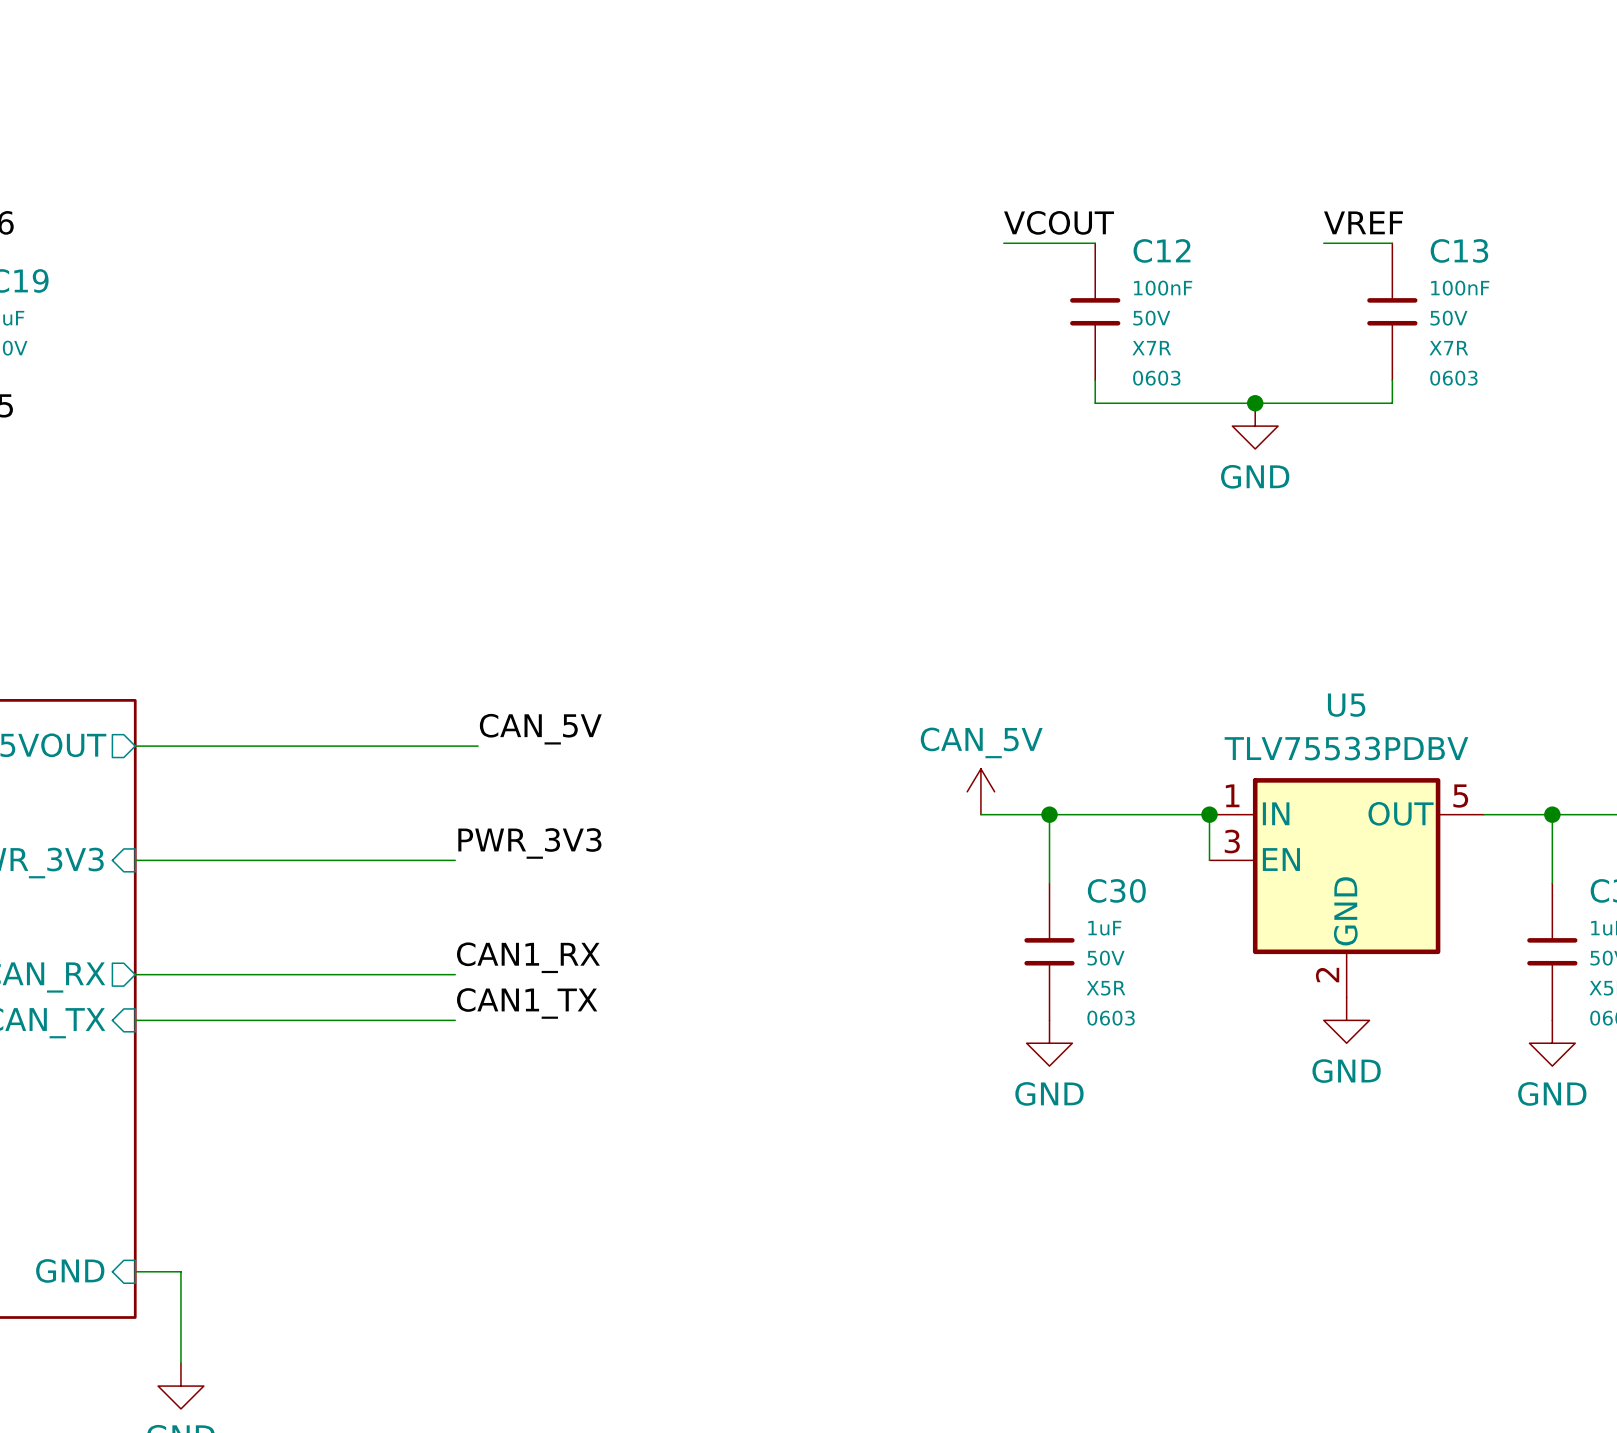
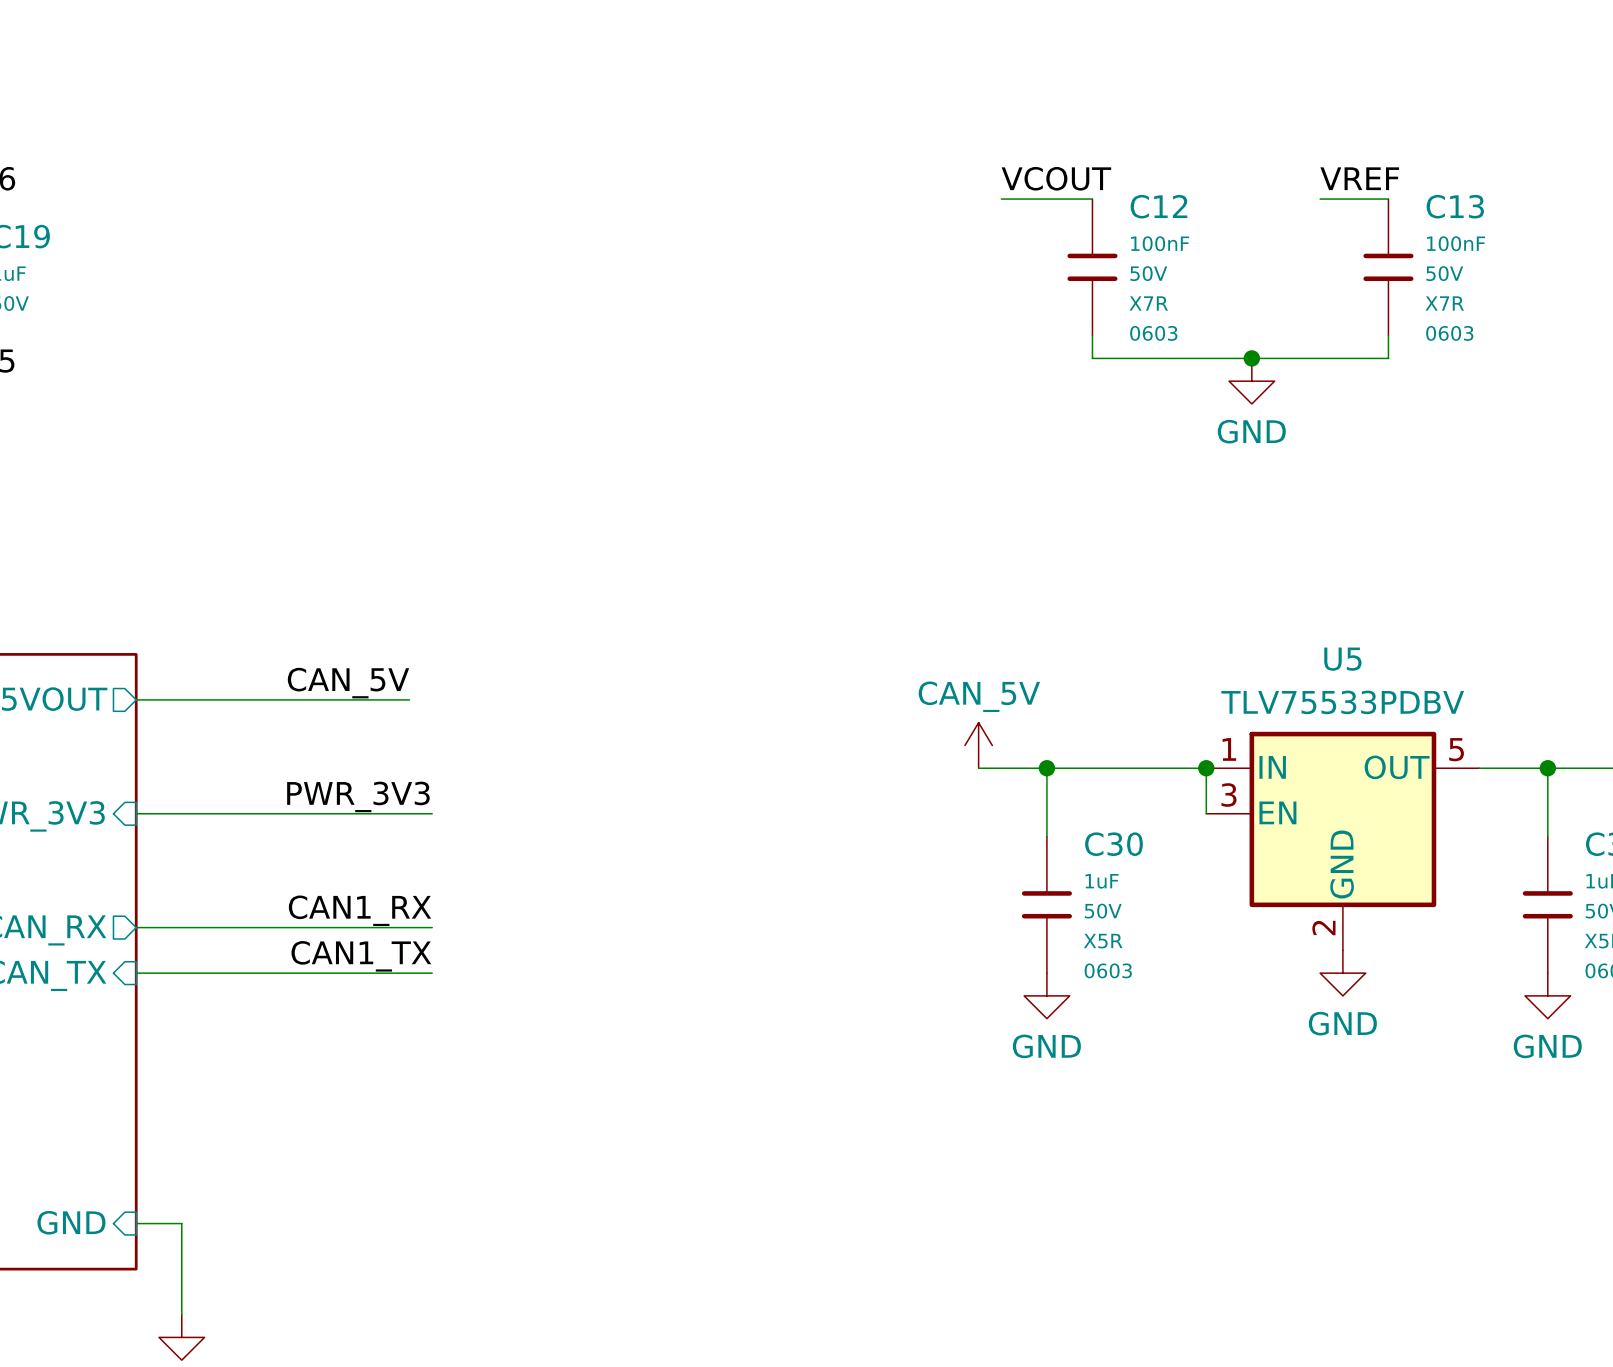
label position: CAN_5V (540, 729) -> CAN_5V (348, 683)
wire: (409, 746) (478, 746) -> none
label position: PWR_3V3 (529, 843) -> PWR_3V3 (358, 796)
wire: (432, 860) (455, 860) -> none
label position: CAN1_RX (528, 957) -> CAN1_RX (360, 910)
wire: (432, 974) (455, 974) -> none
label position: CAN1_TX (527, 1003) -> CAN1_TX (361, 956)
wire: (432, 1020) (455, 1020) -> none

